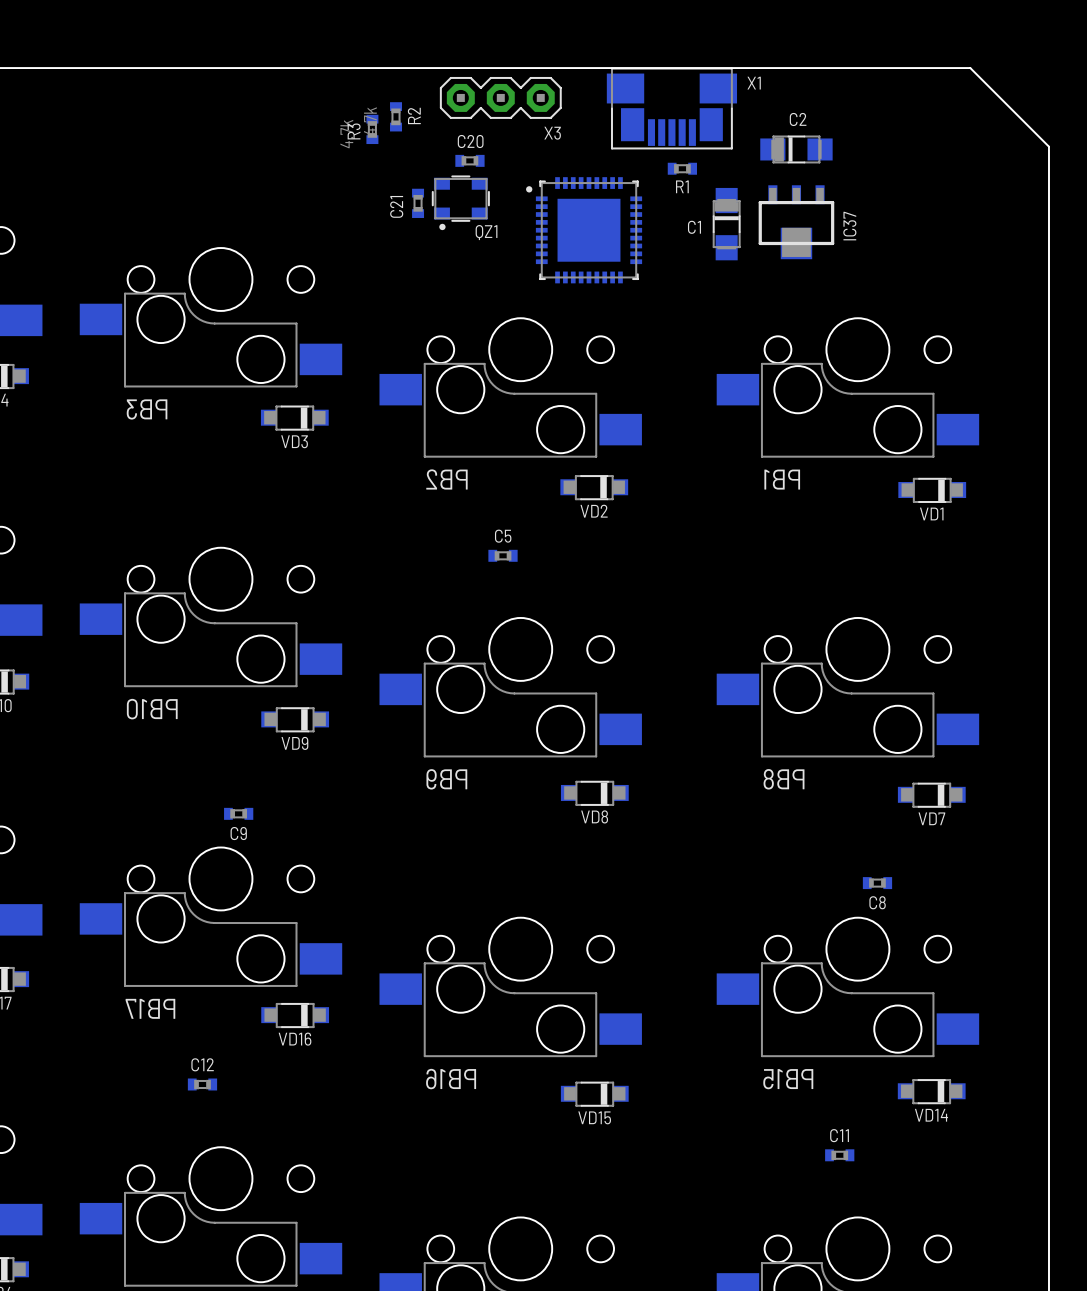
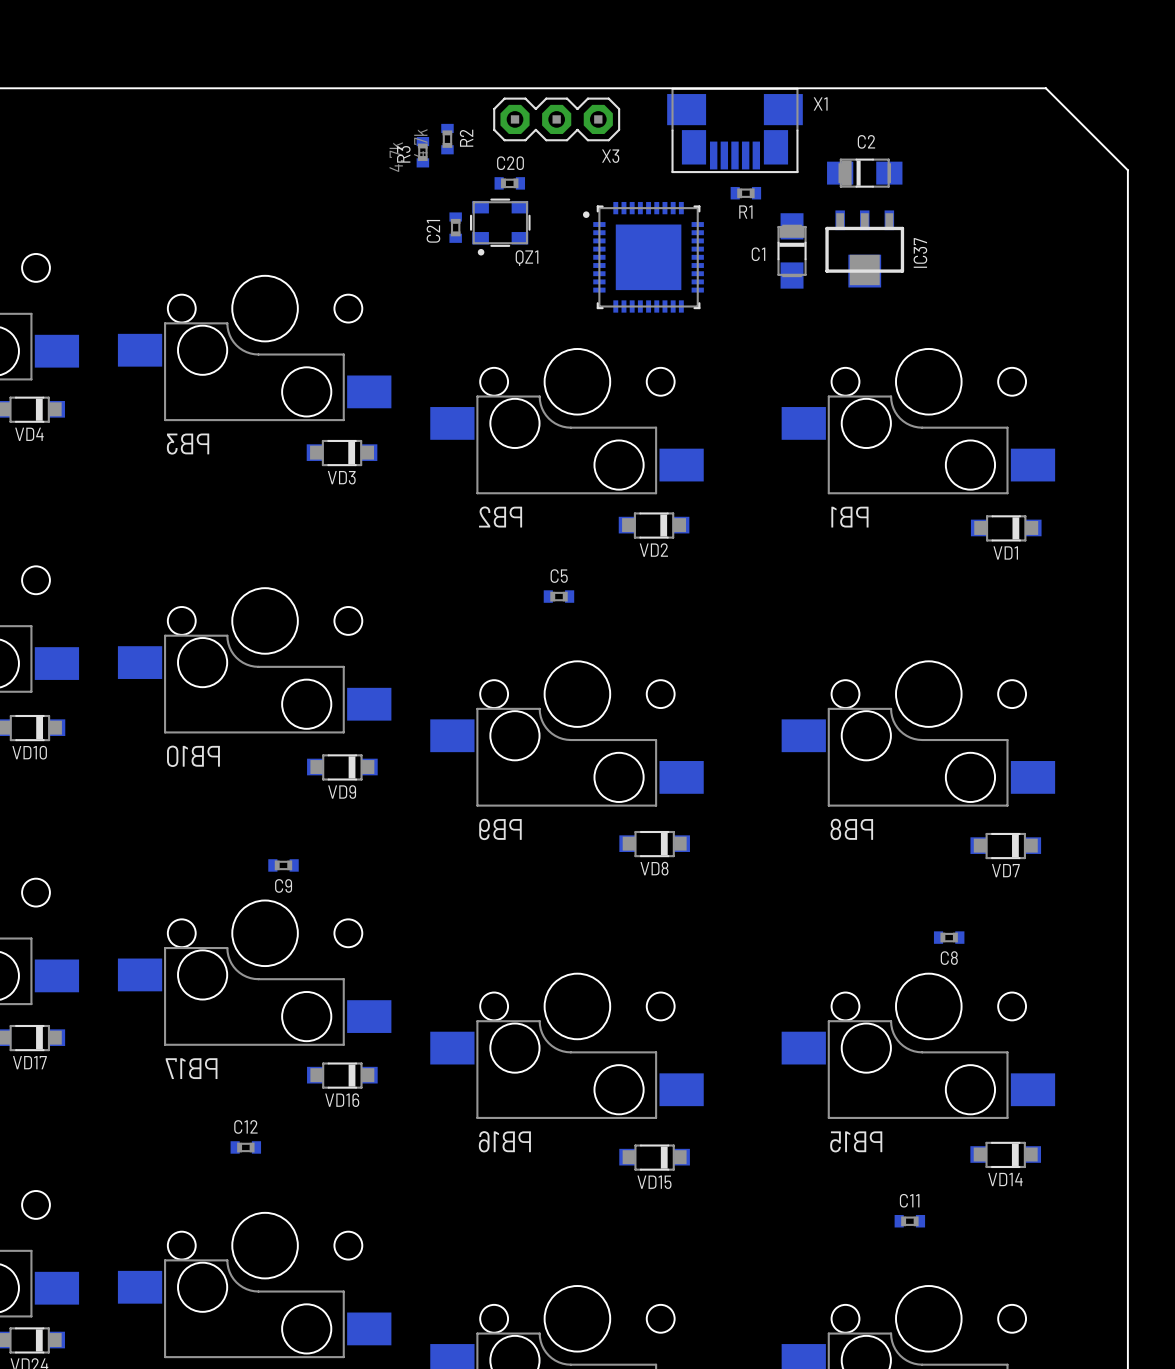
C20 position: (469, 160) -> (509, 183)
QZ1 position: (460, 202) -> (500, 227)
C21 position: (418, 203) -> (455, 227)

